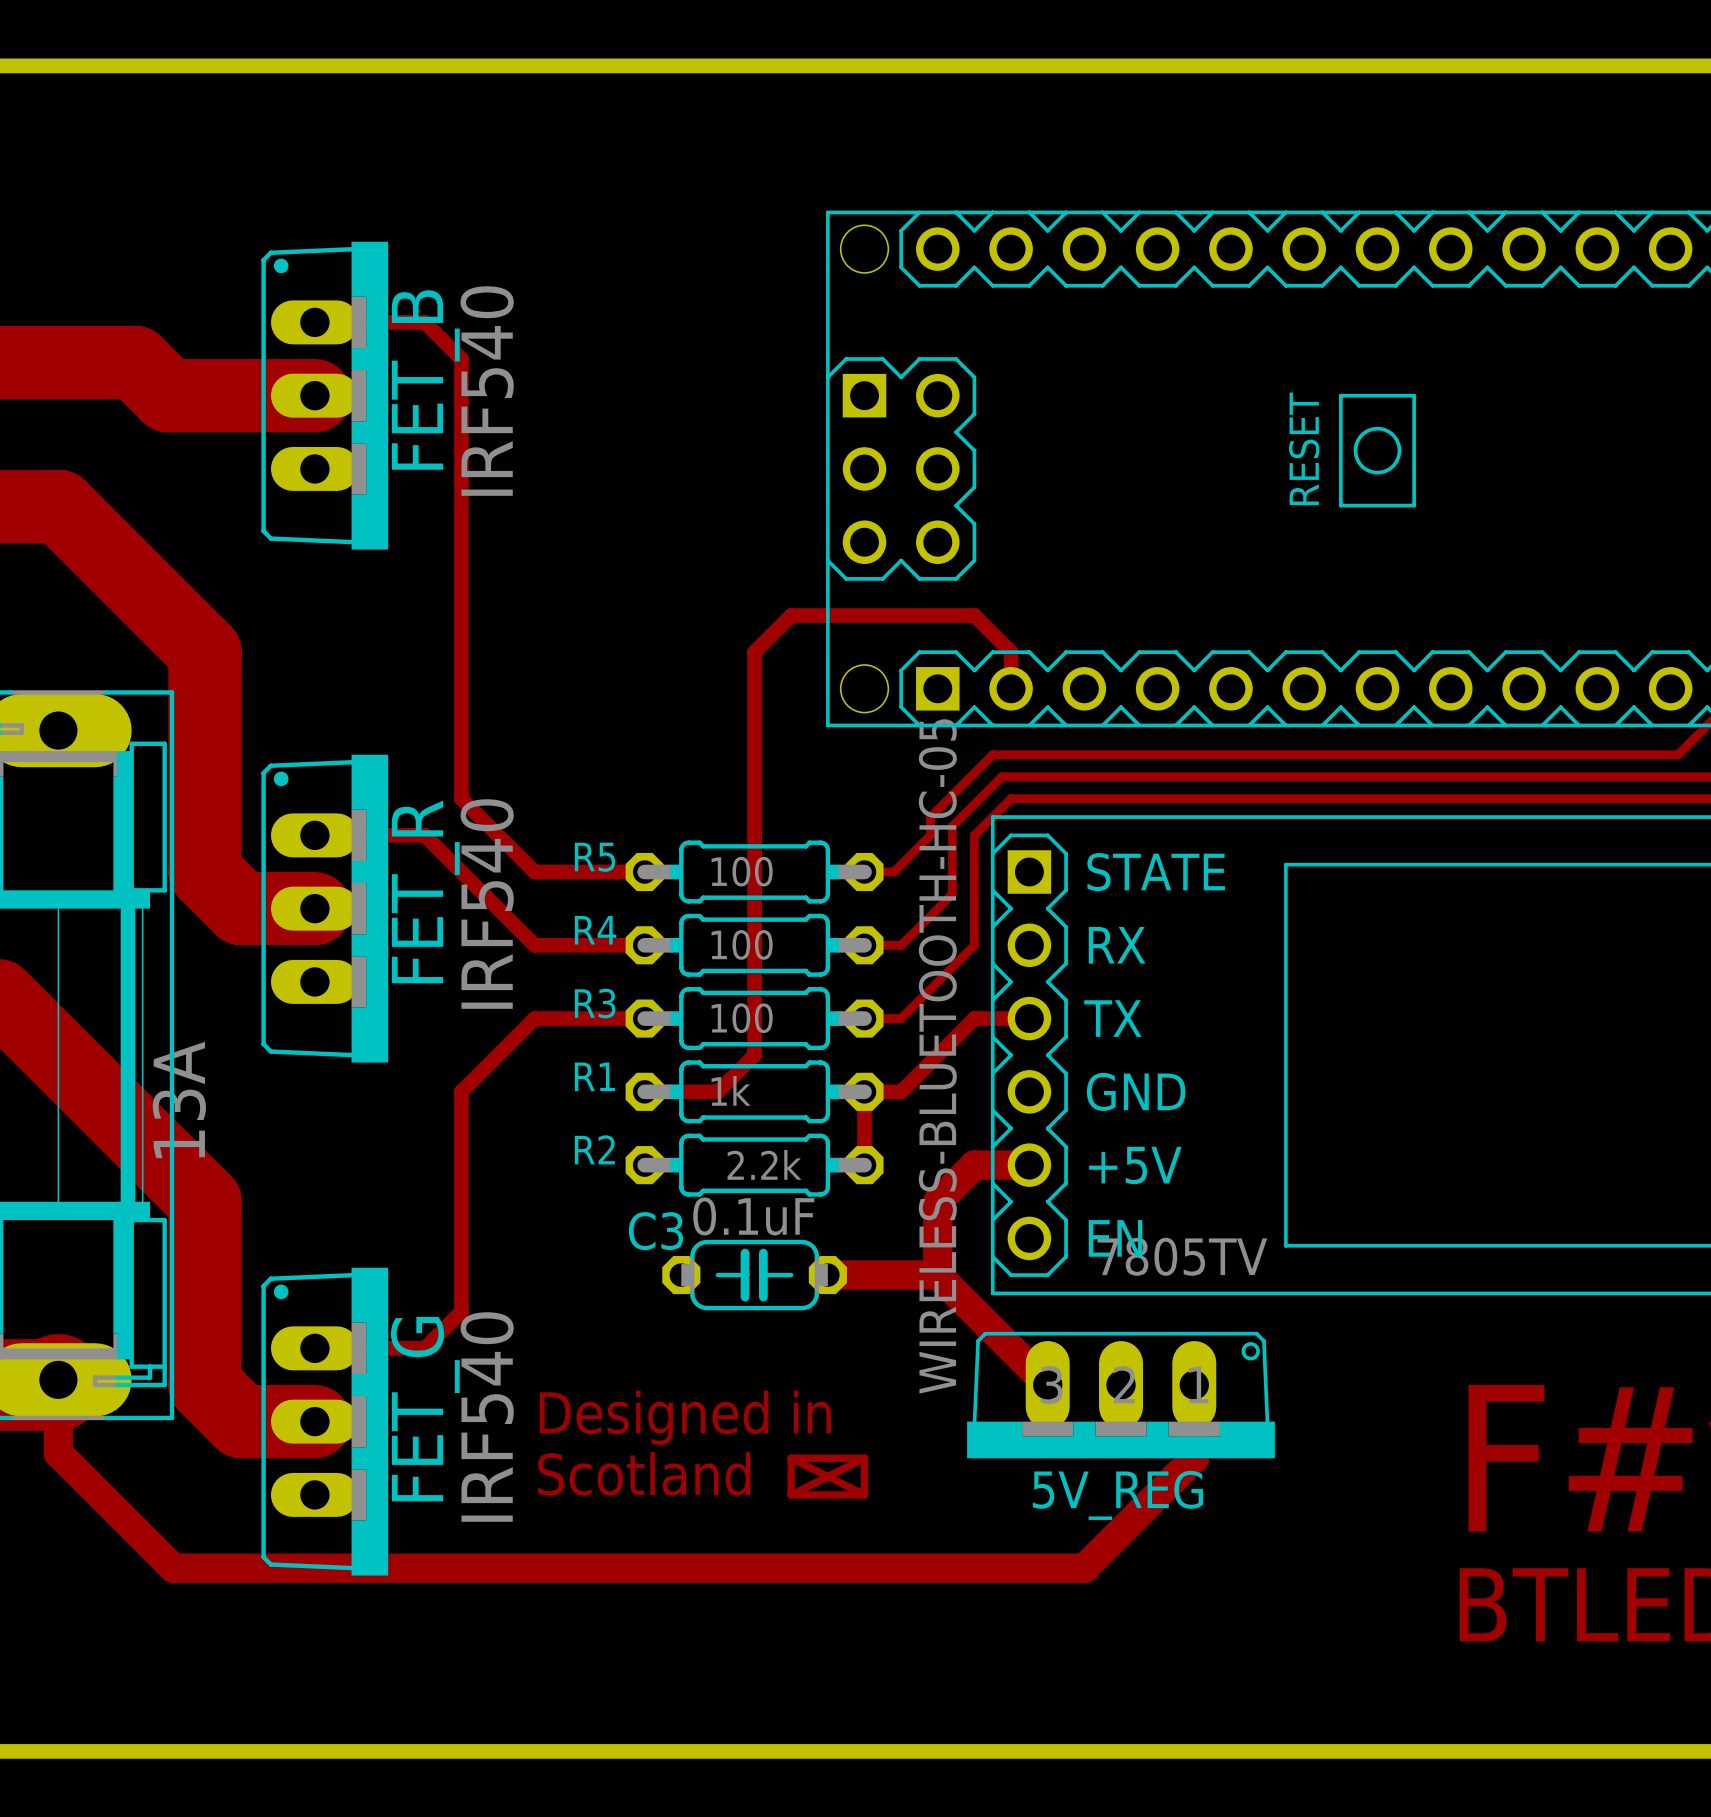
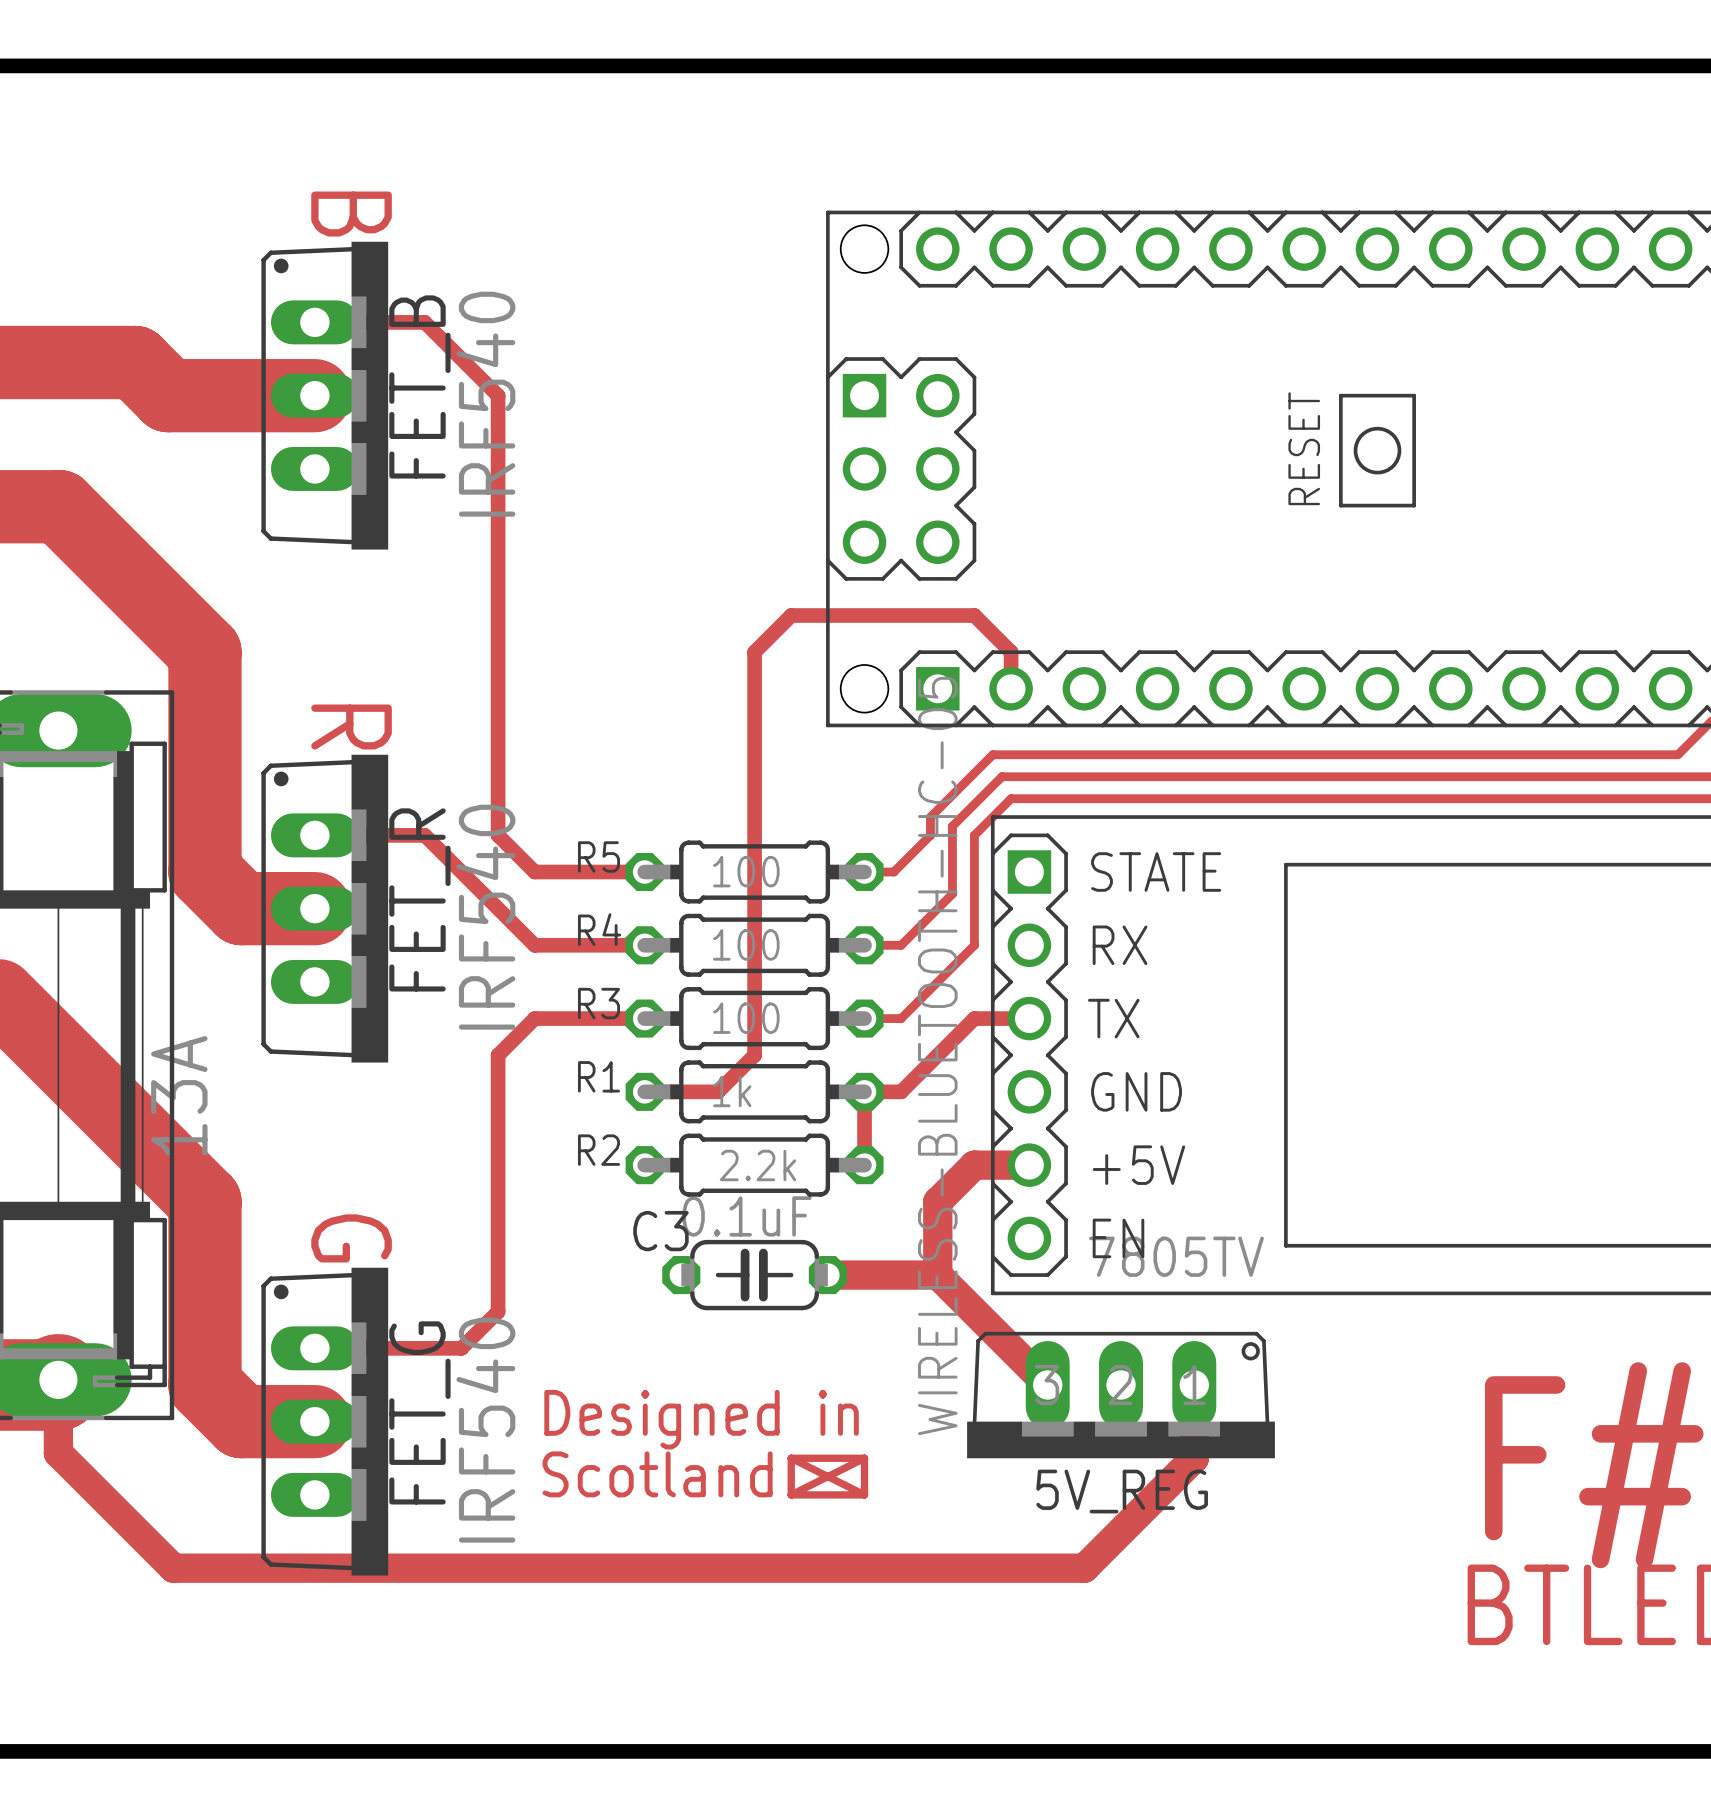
text: none -> B (351, 214)
track: (461, 359) (461, 798) (498, 835) -> (461, 359) (498, 395) (498, 835)
text: none -> R (351, 727)
track: (498, 1055) (461, 1091) (461, 1311) (424, 1348) -> (498, 1055) (498, 1311) (461, 1348) (424, 1348)
text: none -> G (351, 1238)

